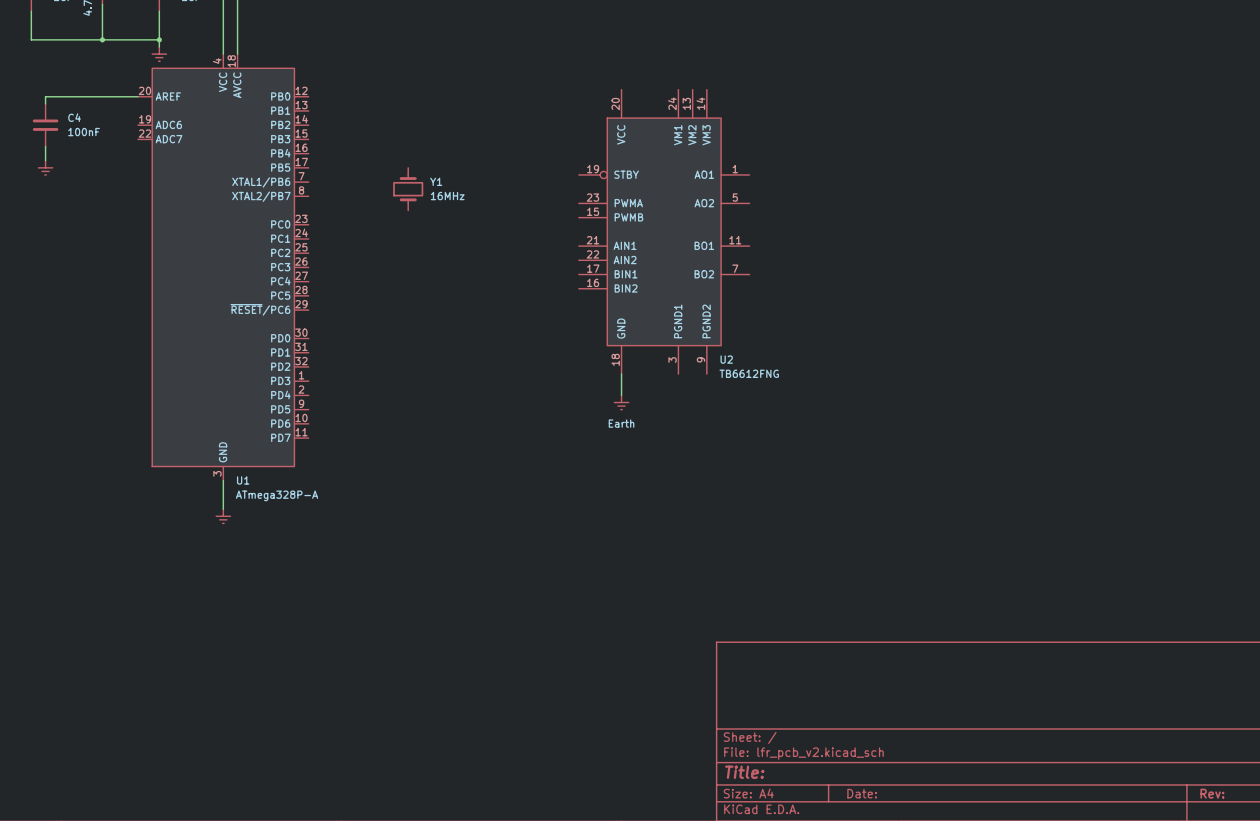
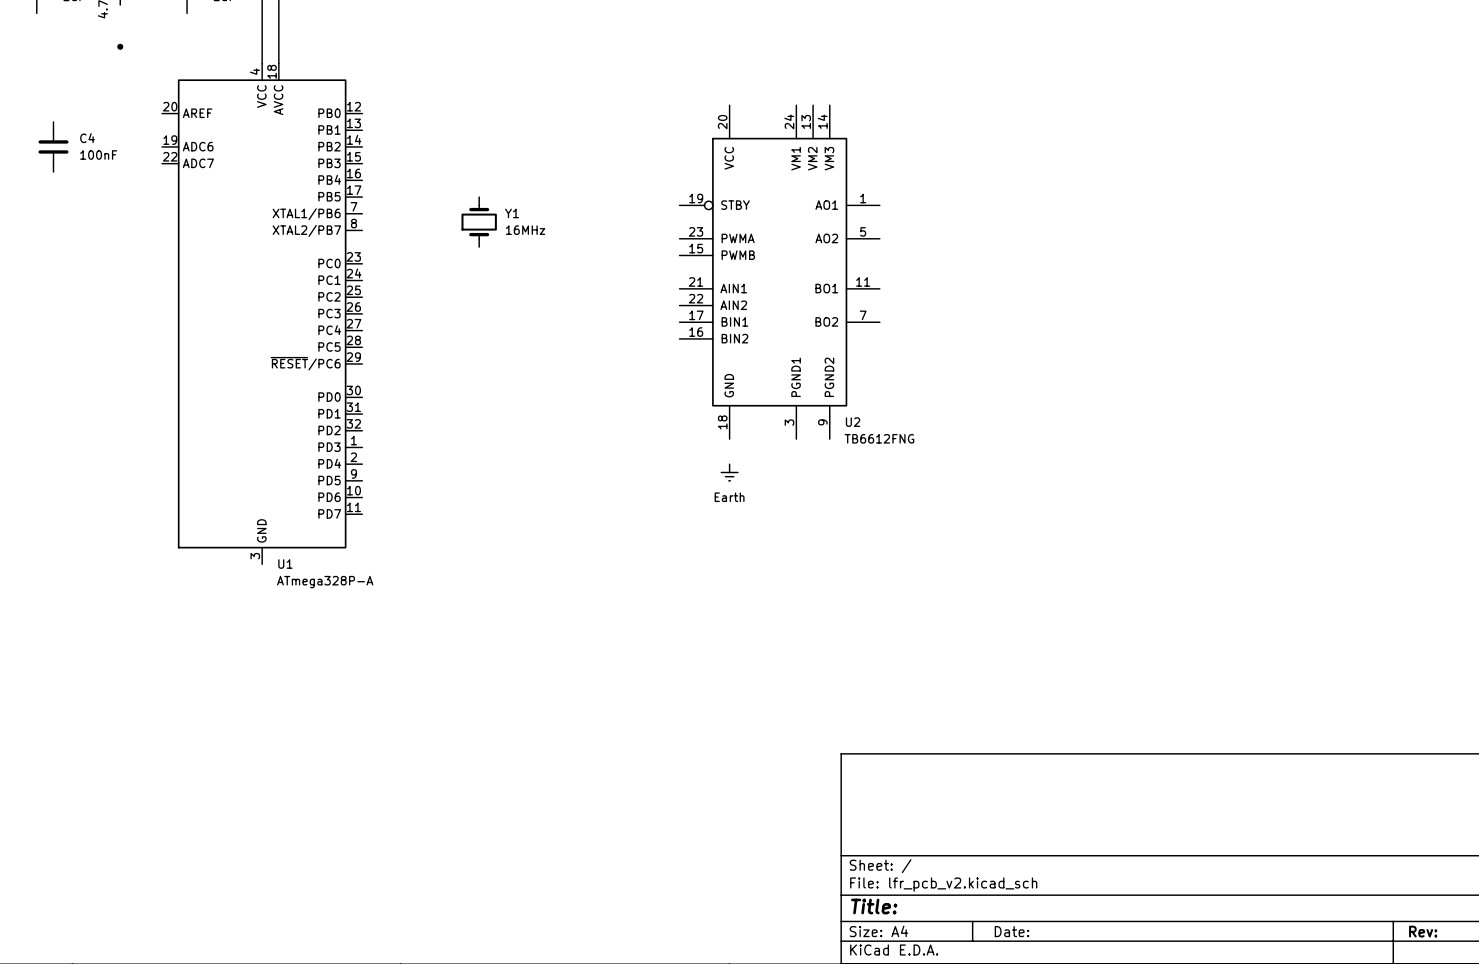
wire: (102, 4) (102, 39) -> none
wire: (31, 11) (31, 39) (159, 39) -> none
wire: (159, 11) (159, 46) -> none
junction: (159, 39) -> none
power symbol: (159, 54) -> none
wire: (138, 96) (45, 96) (45, 103) -> none
wire: (45, 146) (45, 160) -> none
power symbol: (45, 167) -> none
wire: (621, 374) (621, 395) -> none
wire: (223, 480) (223, 509) -> none
power symbol: (223, 516) -> none

